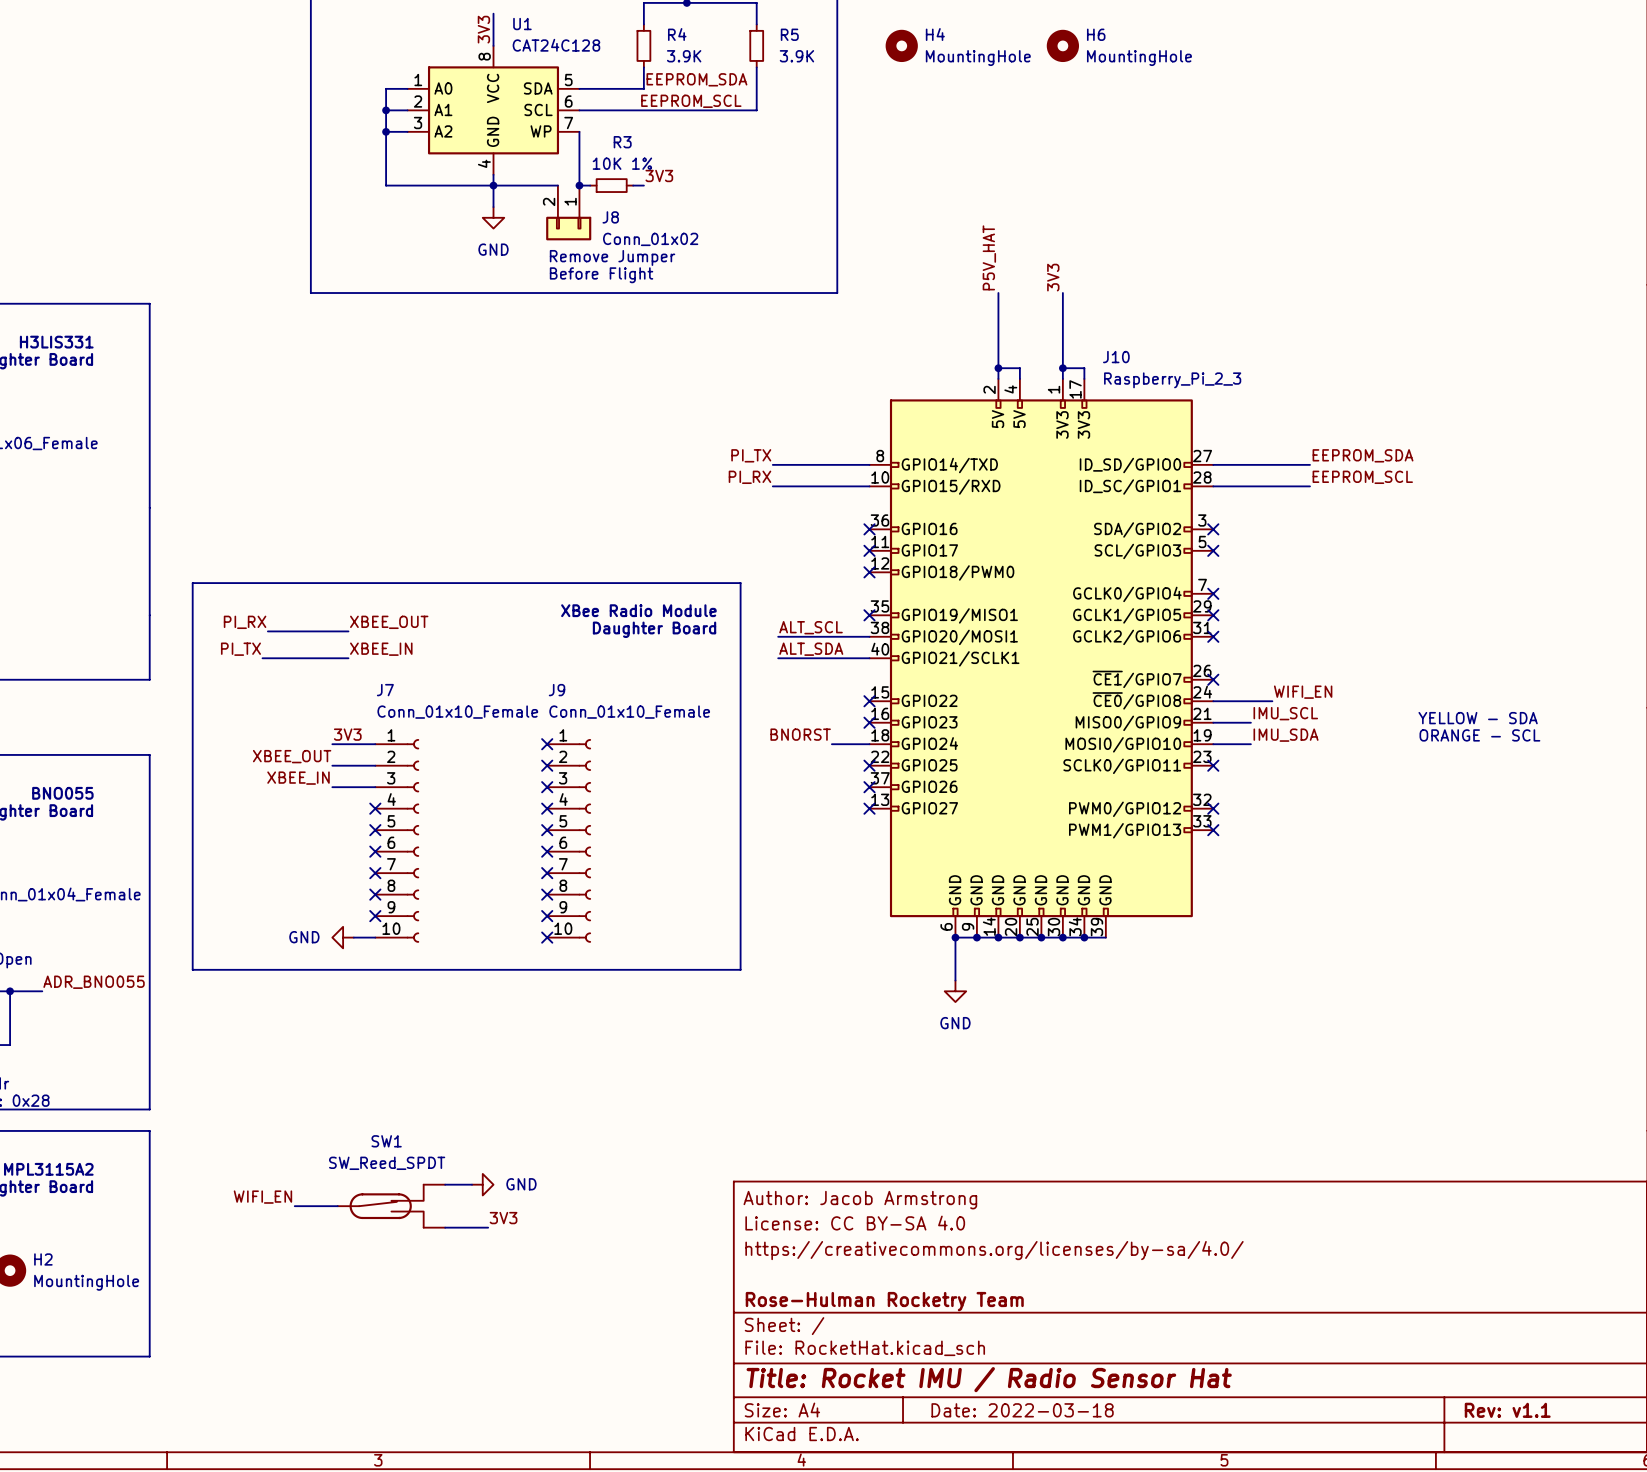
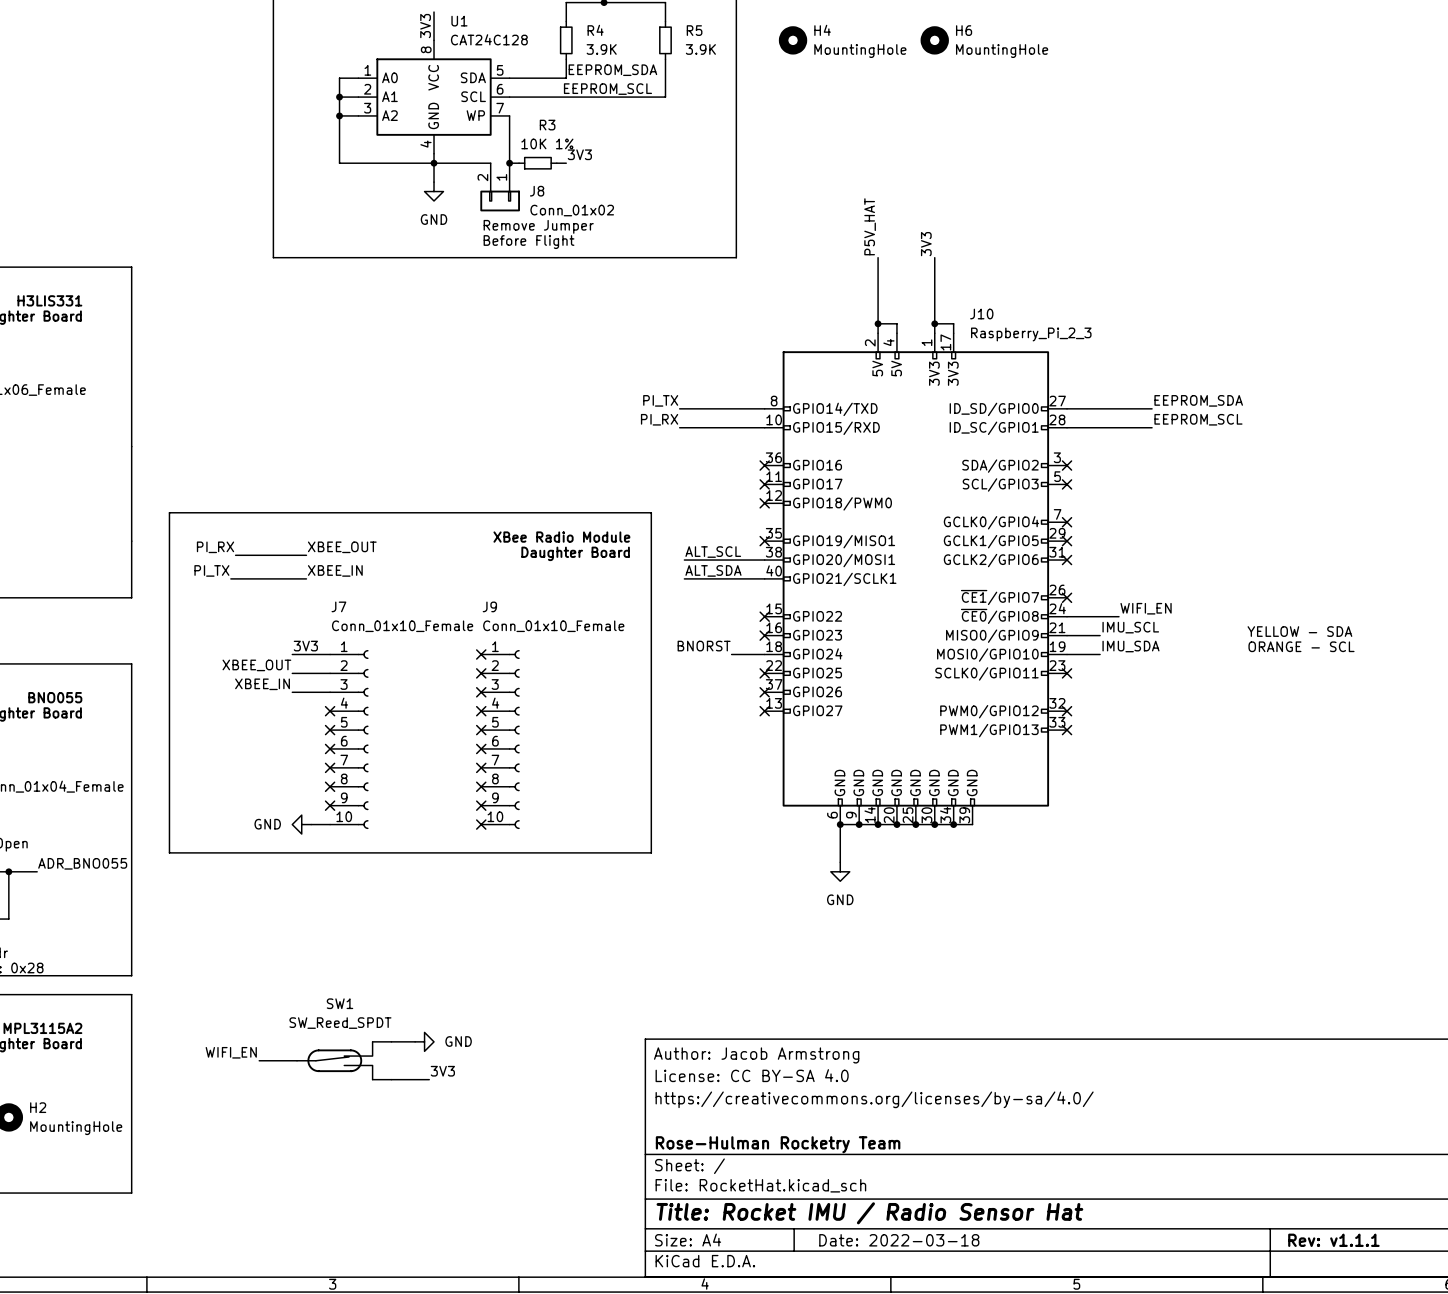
title block: Rev: v1.1 (1507, 1410) -> Rev: v1.1.1 (1333, 1240)

